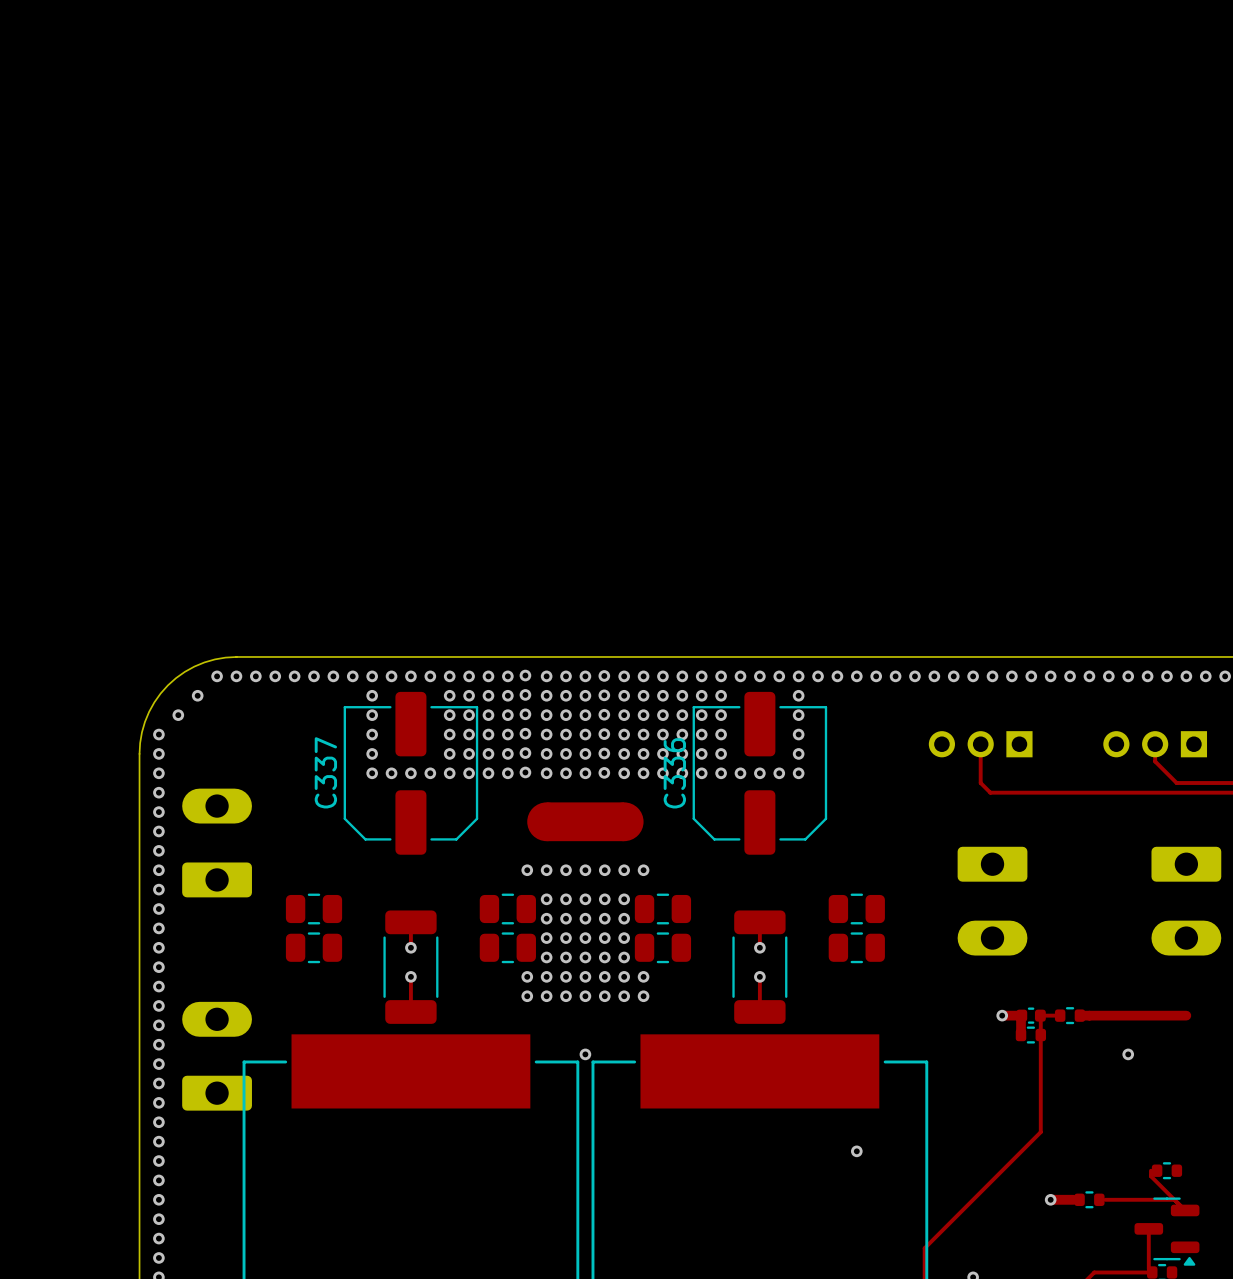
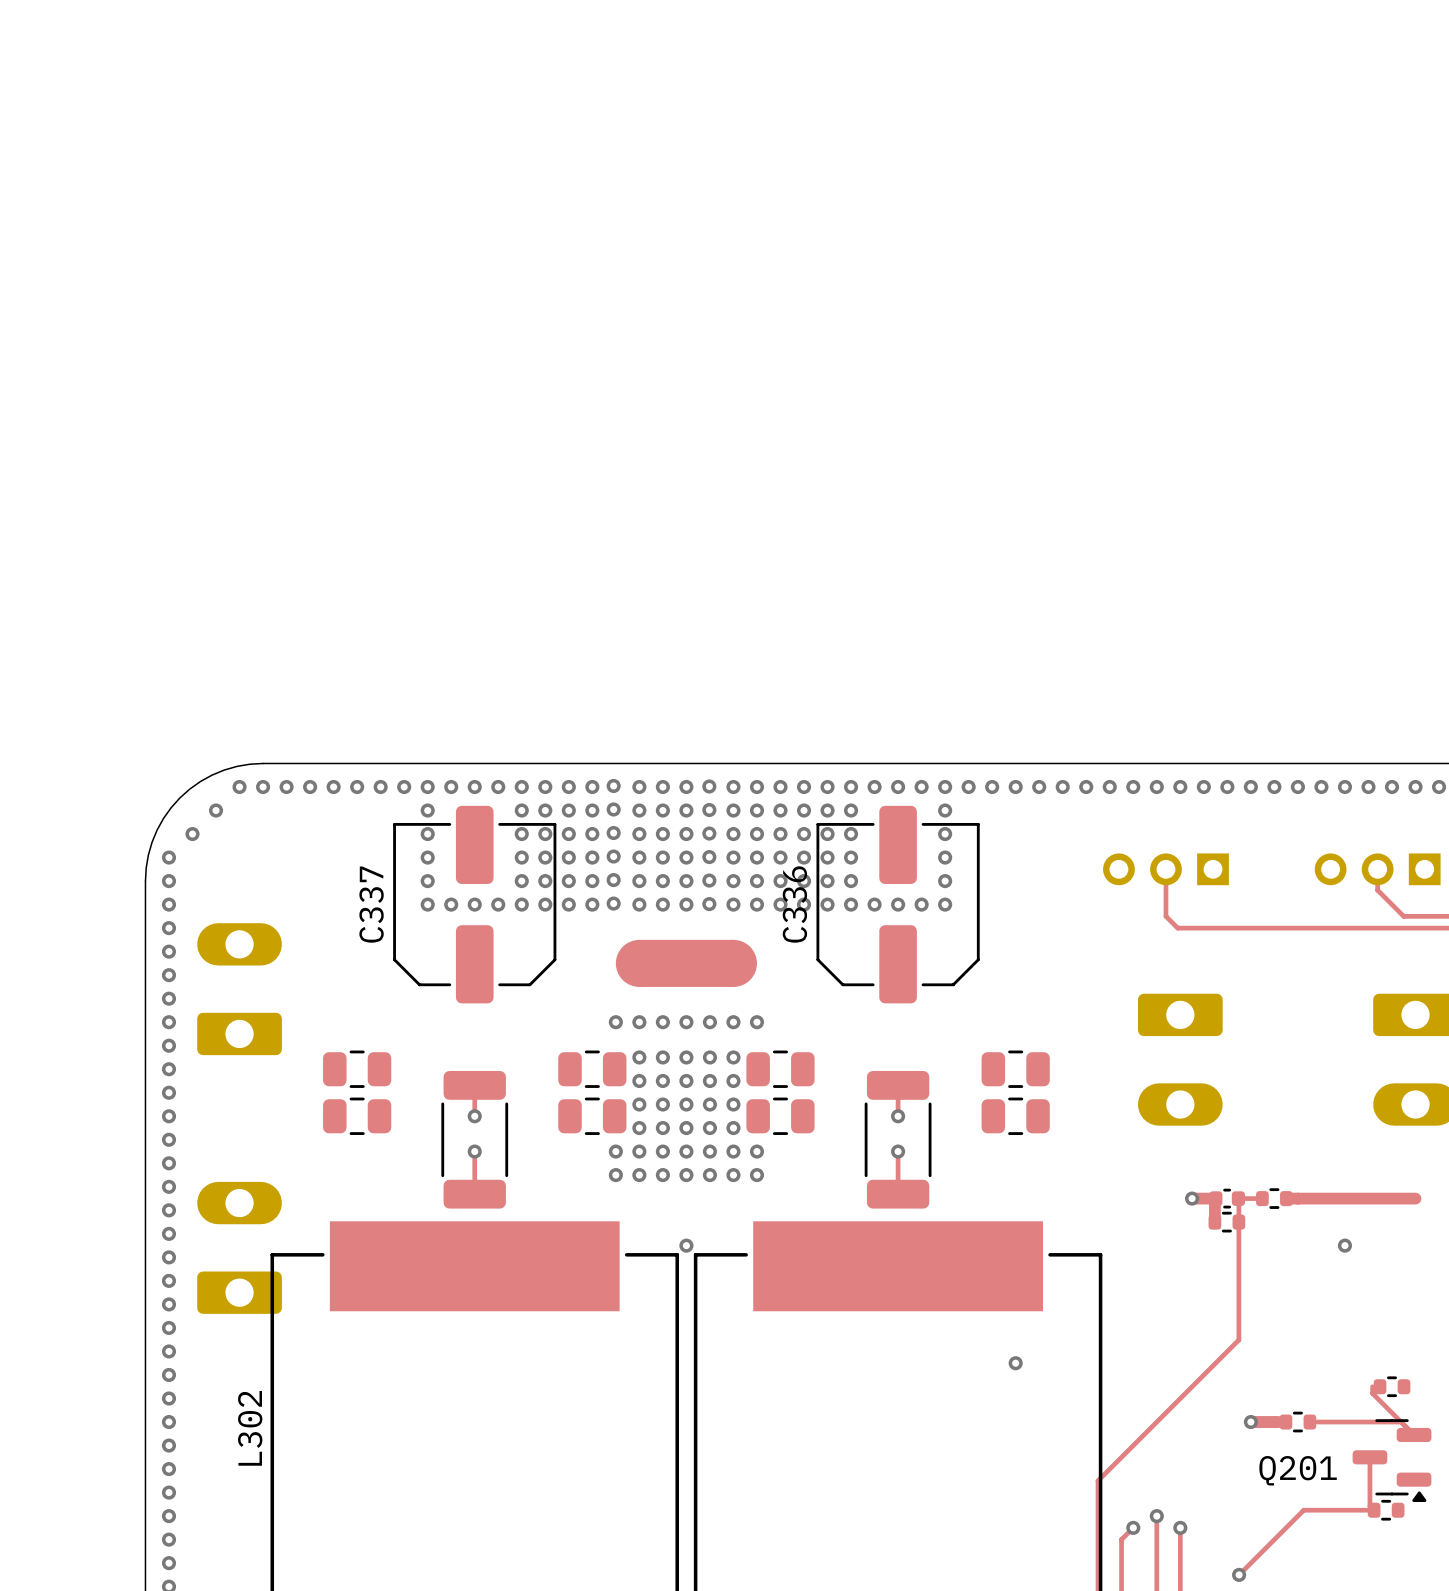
L302 name: none -> L302 (250, 1428)
Q201 name: none -> Q201 (1298, 1470)

